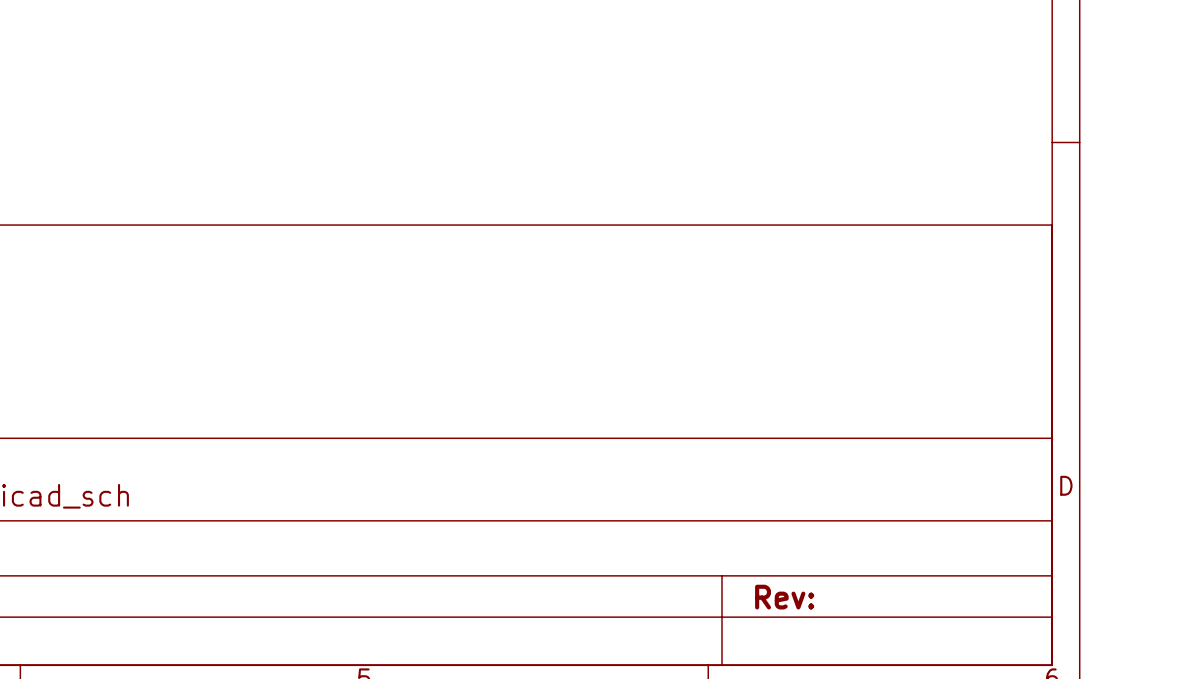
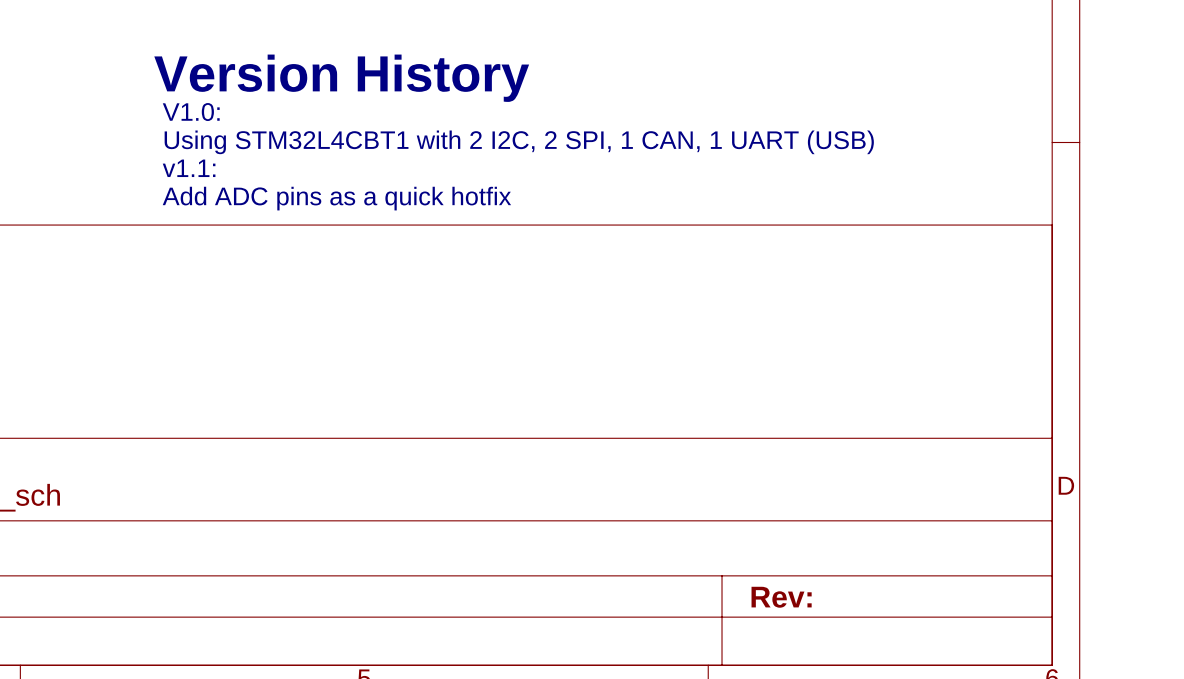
text: none -> Version History (341, 78)
text: none -> V1.0: (191, 112)
text: none -> Using STM32L4CBT1 with 2 I2C, 2 SPI, 1 CAN, 1 UART (USB) (519, 142)
text: none -> v1.1: (189, 168)
text: none -> Add ADC pins as a quick hotfix (336, 198)

